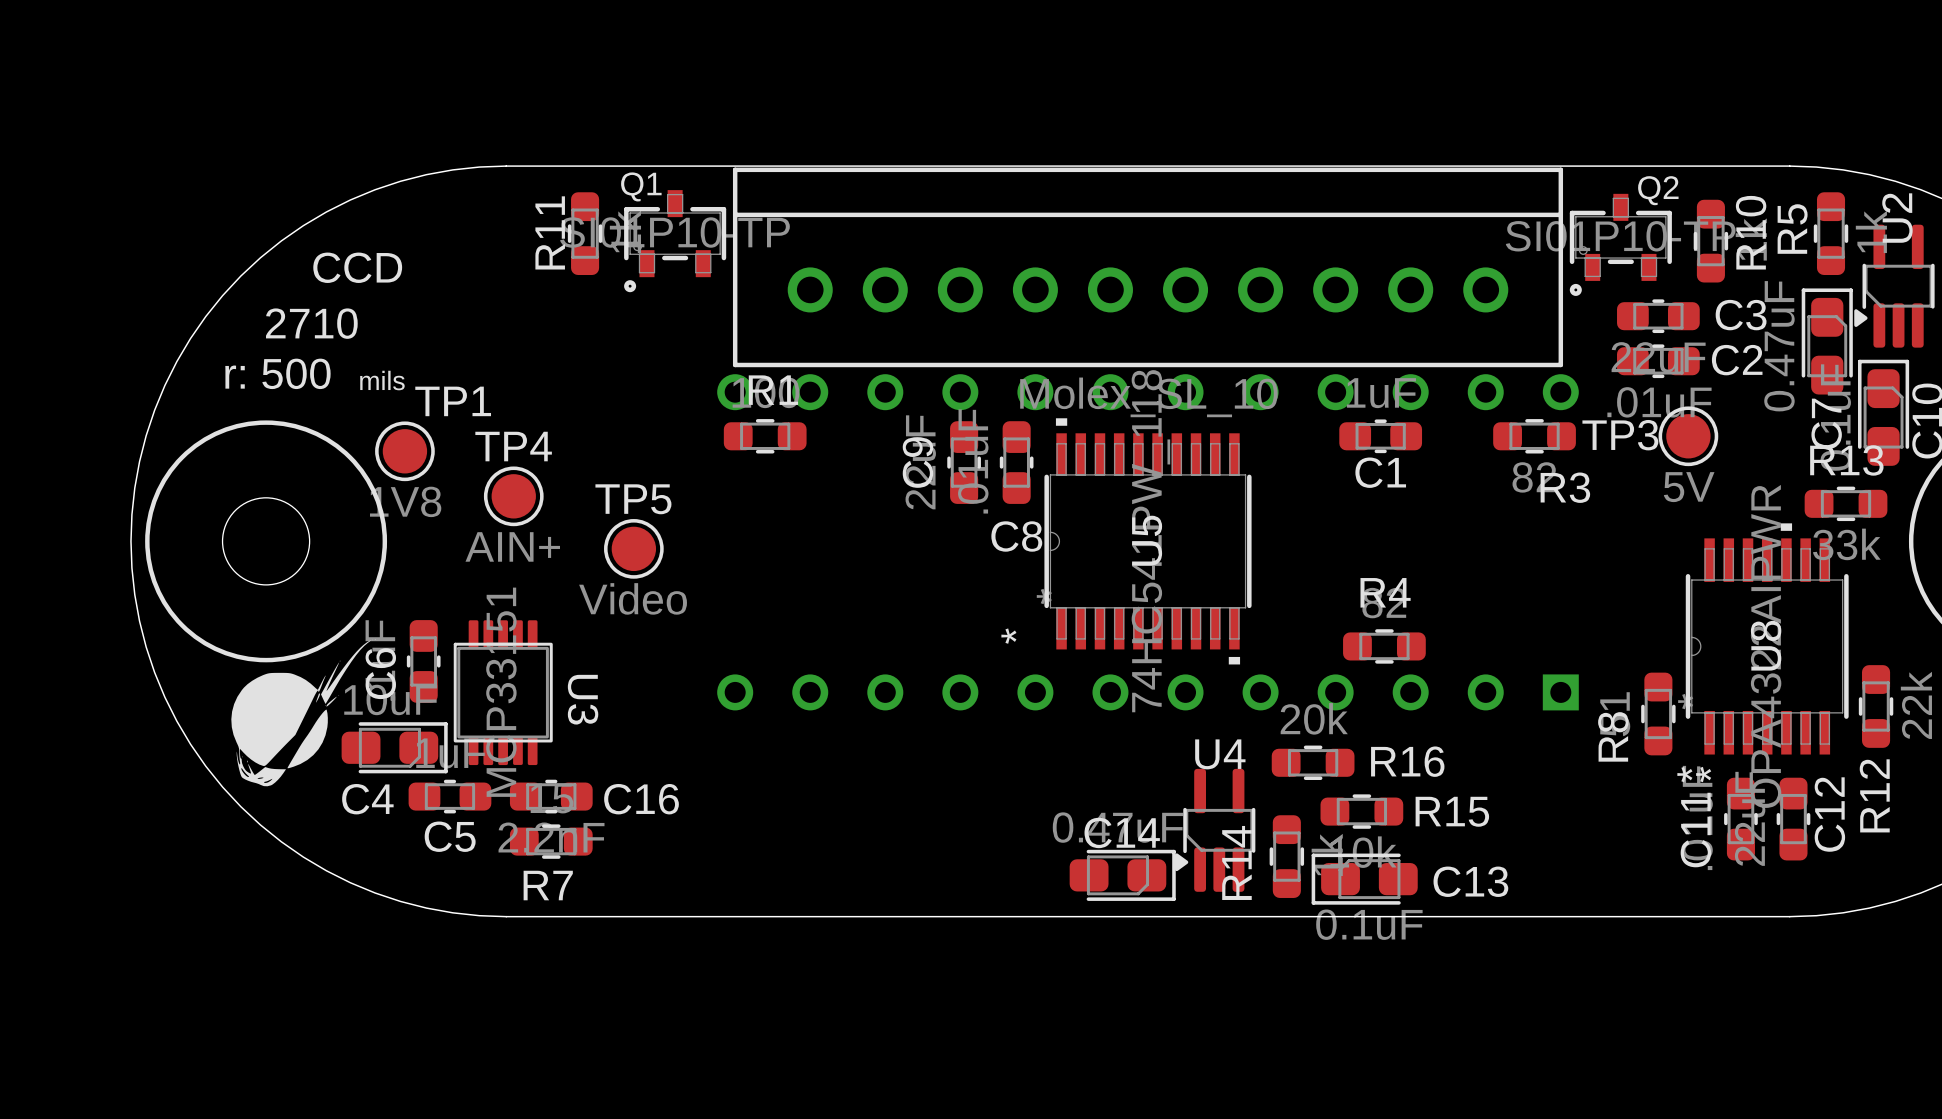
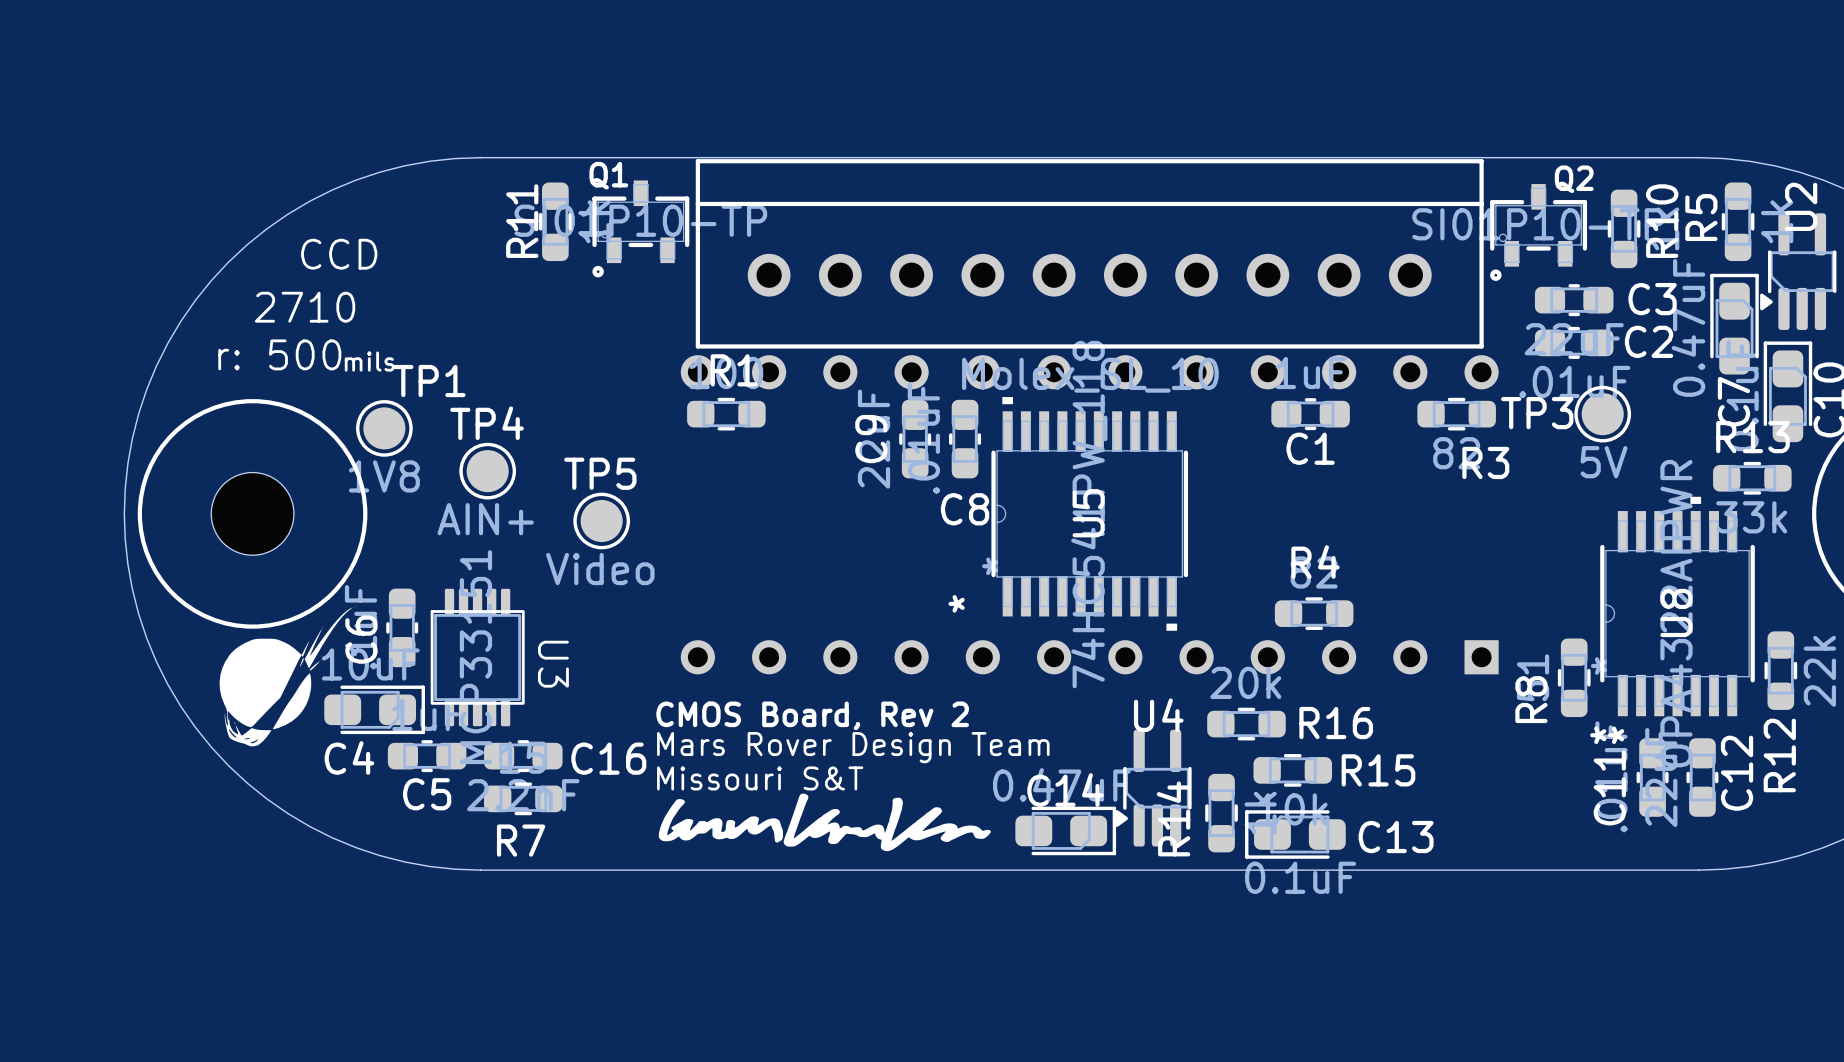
text: none -> CMOS Board, Rev 2 (812, 715)
text: none -> Mars Rover Design Team (853, 747)
text: none -> Missouri S&T (760, 778)
drawing: none -> [658, 793, 991, 852]

